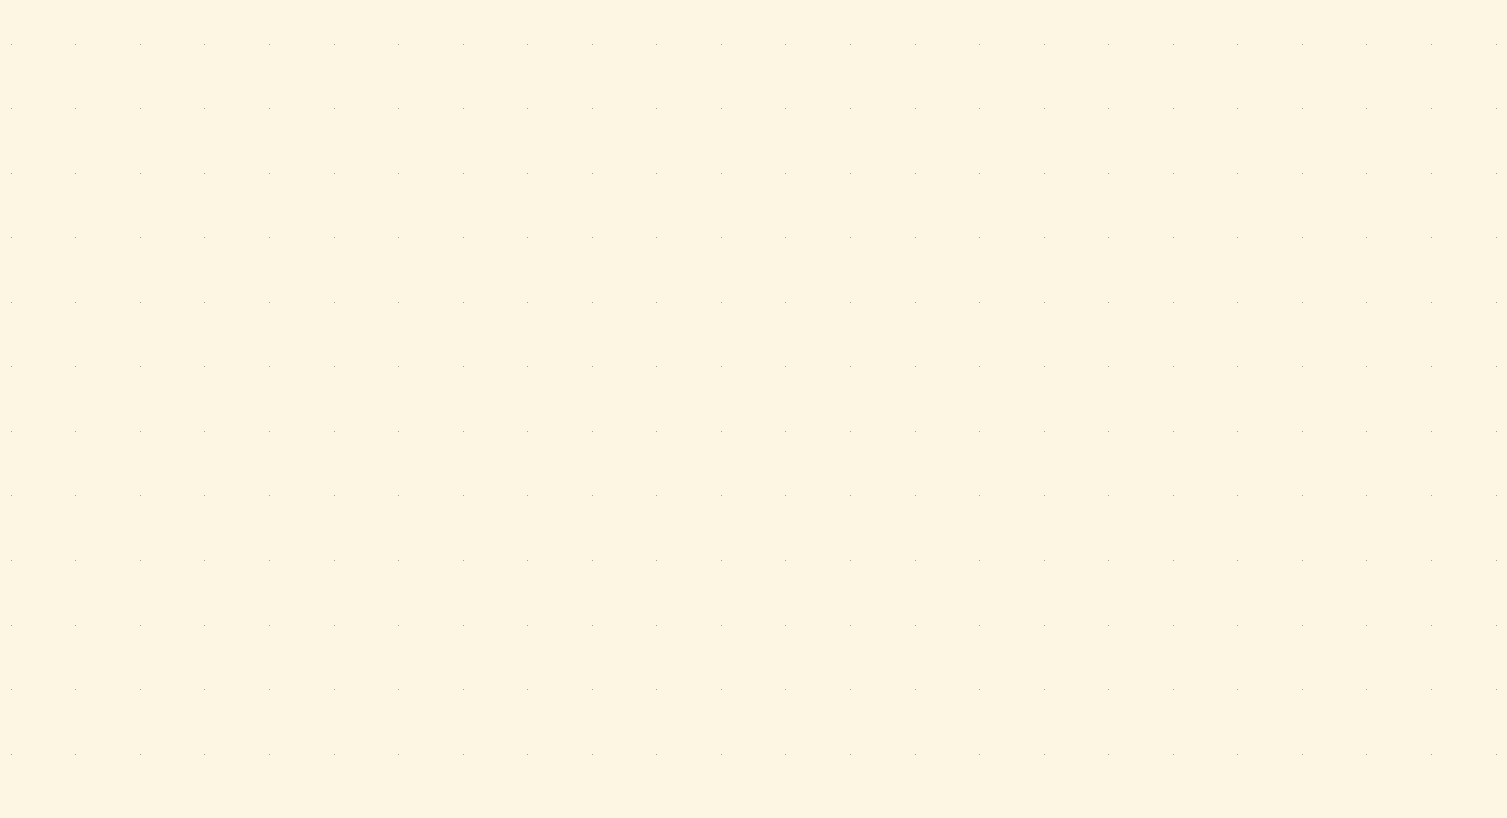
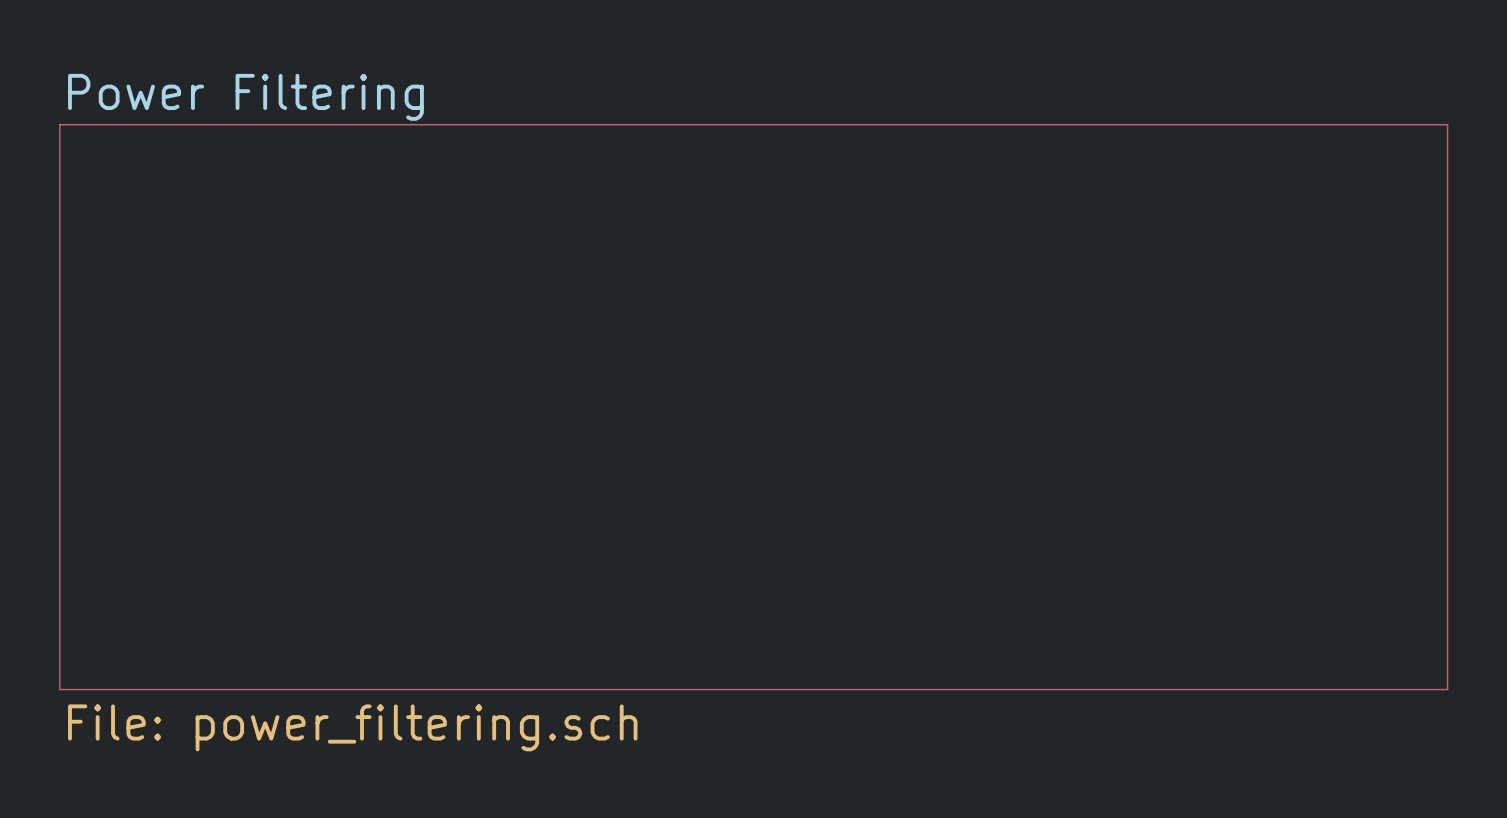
sheet Power Filtering: none -> File: power_filtering.sch (753, 407)

